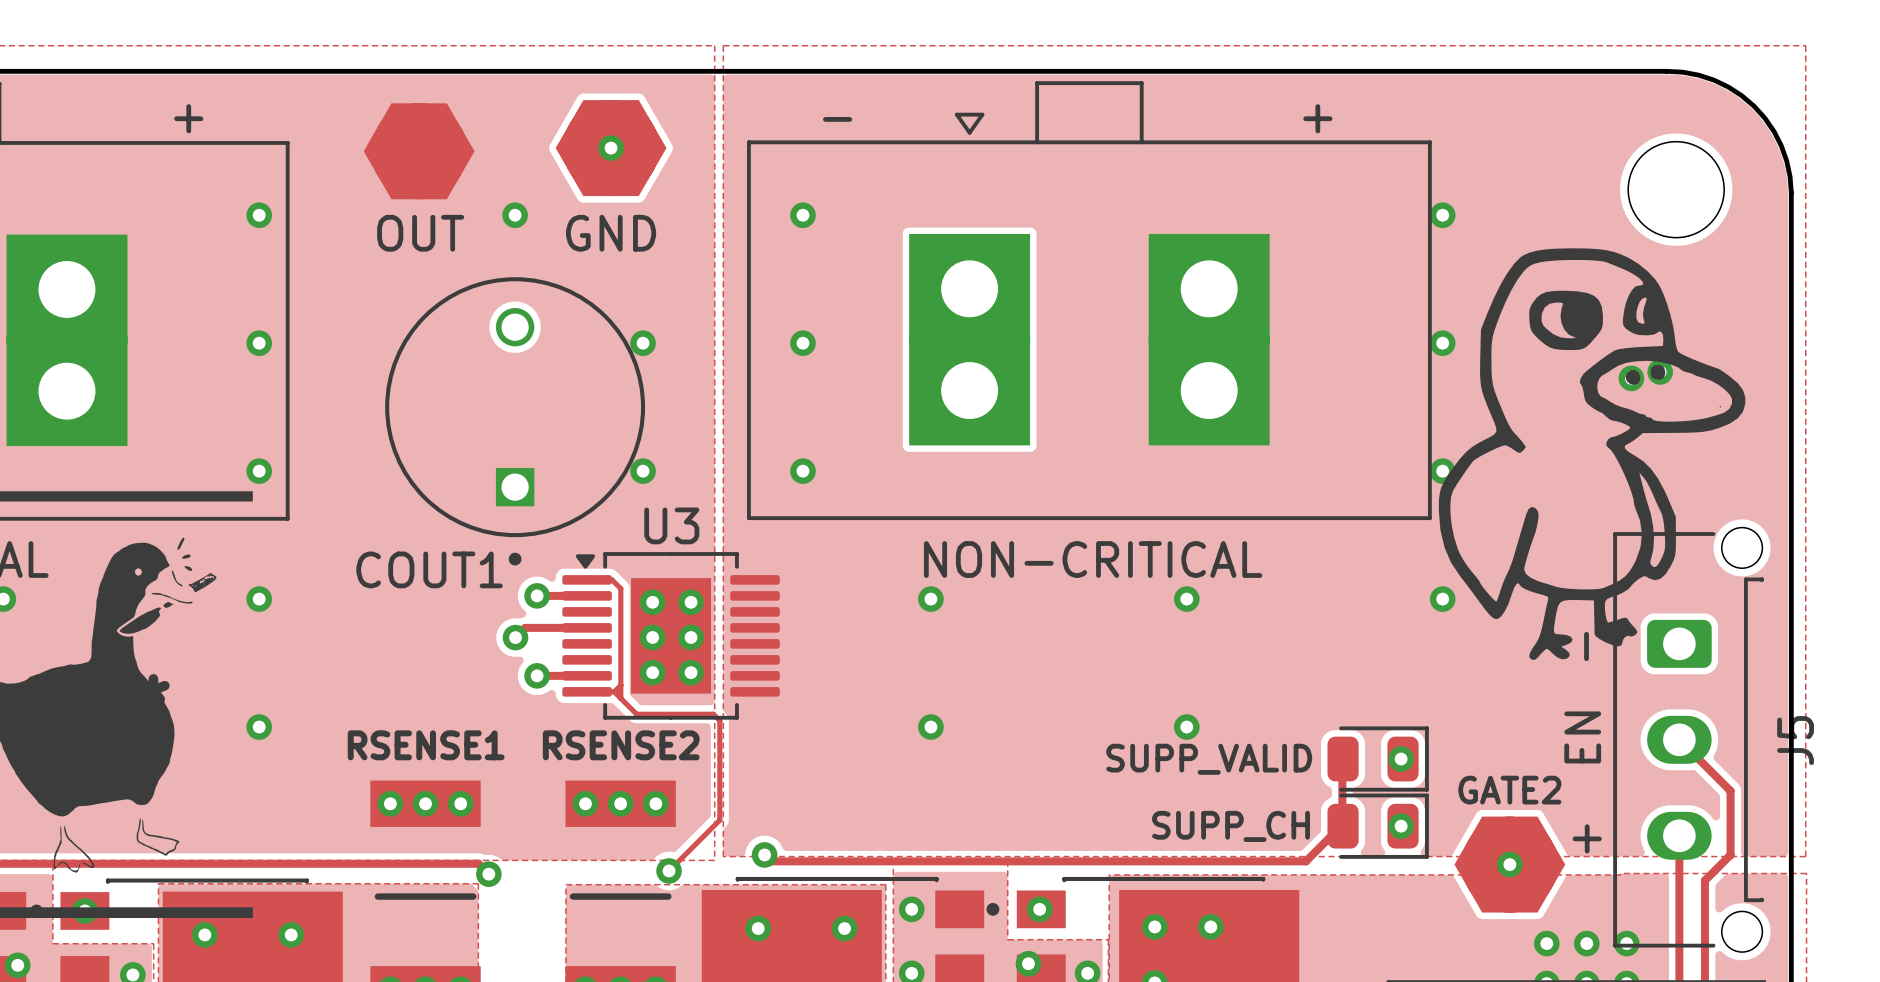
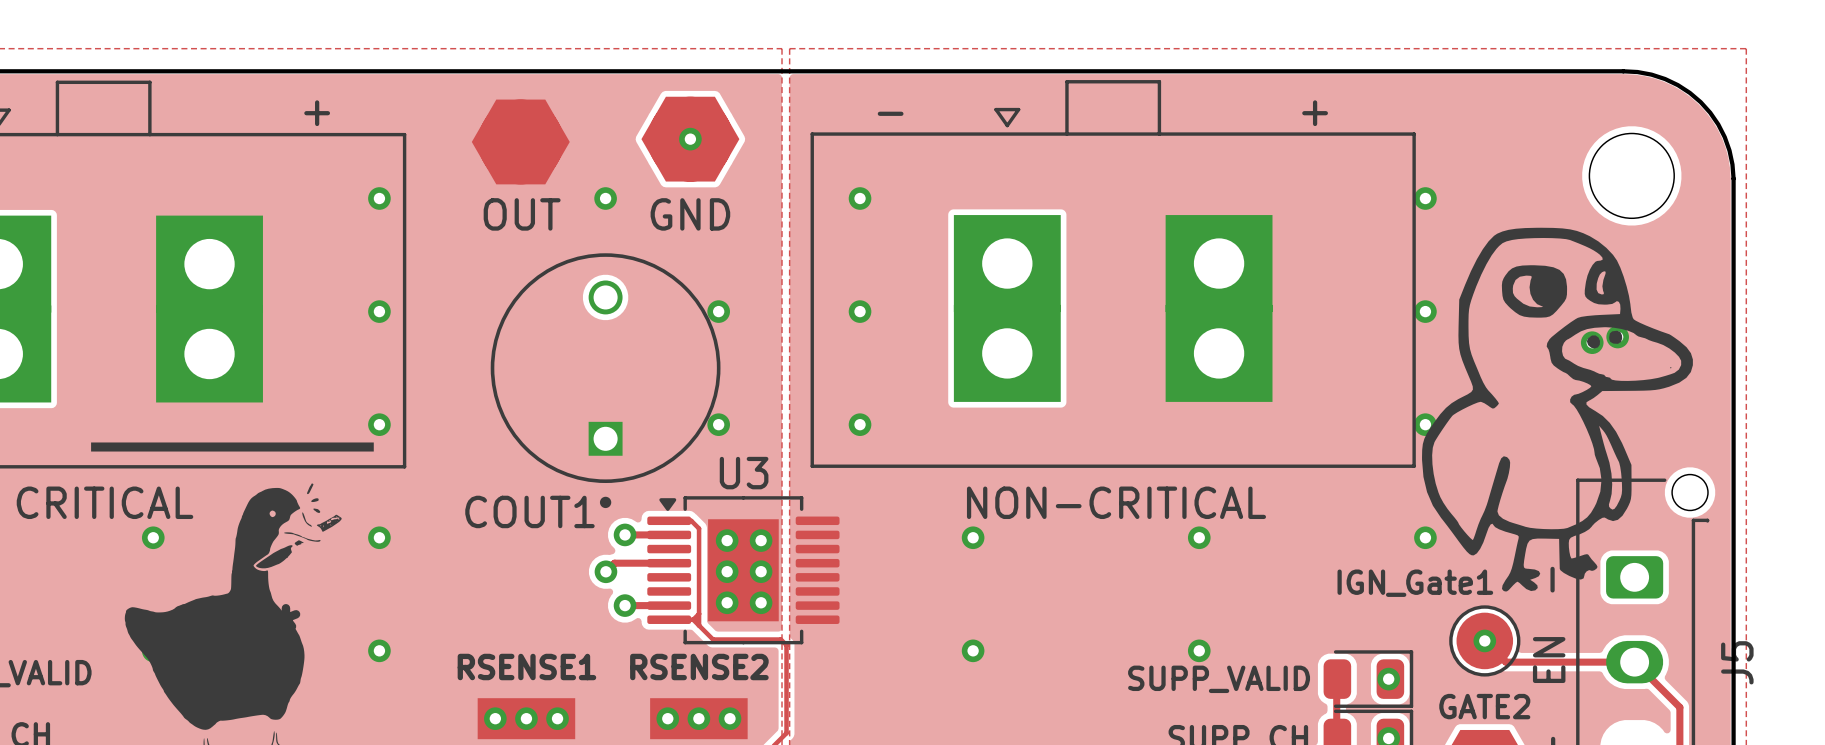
track: none -> (1484, 640) (1506, 662) (1634, 662)
IGN_Gate1: none -> (1484, 640)
via: none -> (1484, 640)

